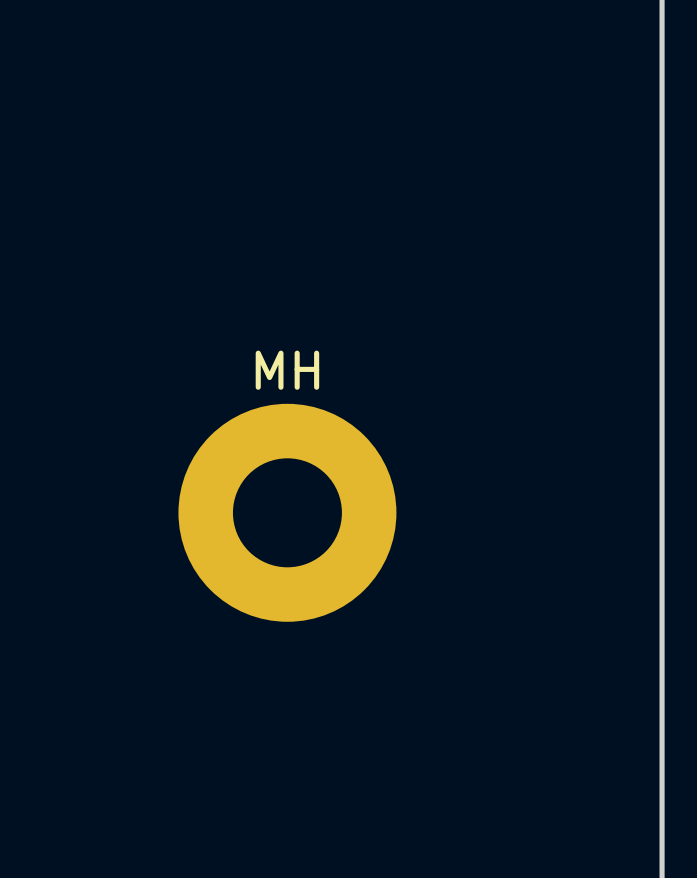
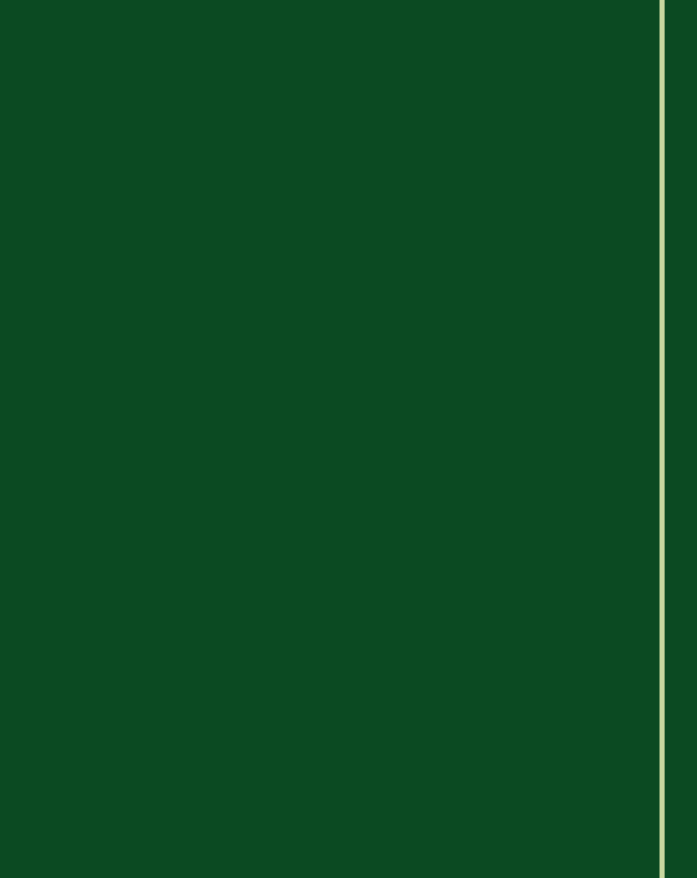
MH: (287, 512) -> none

